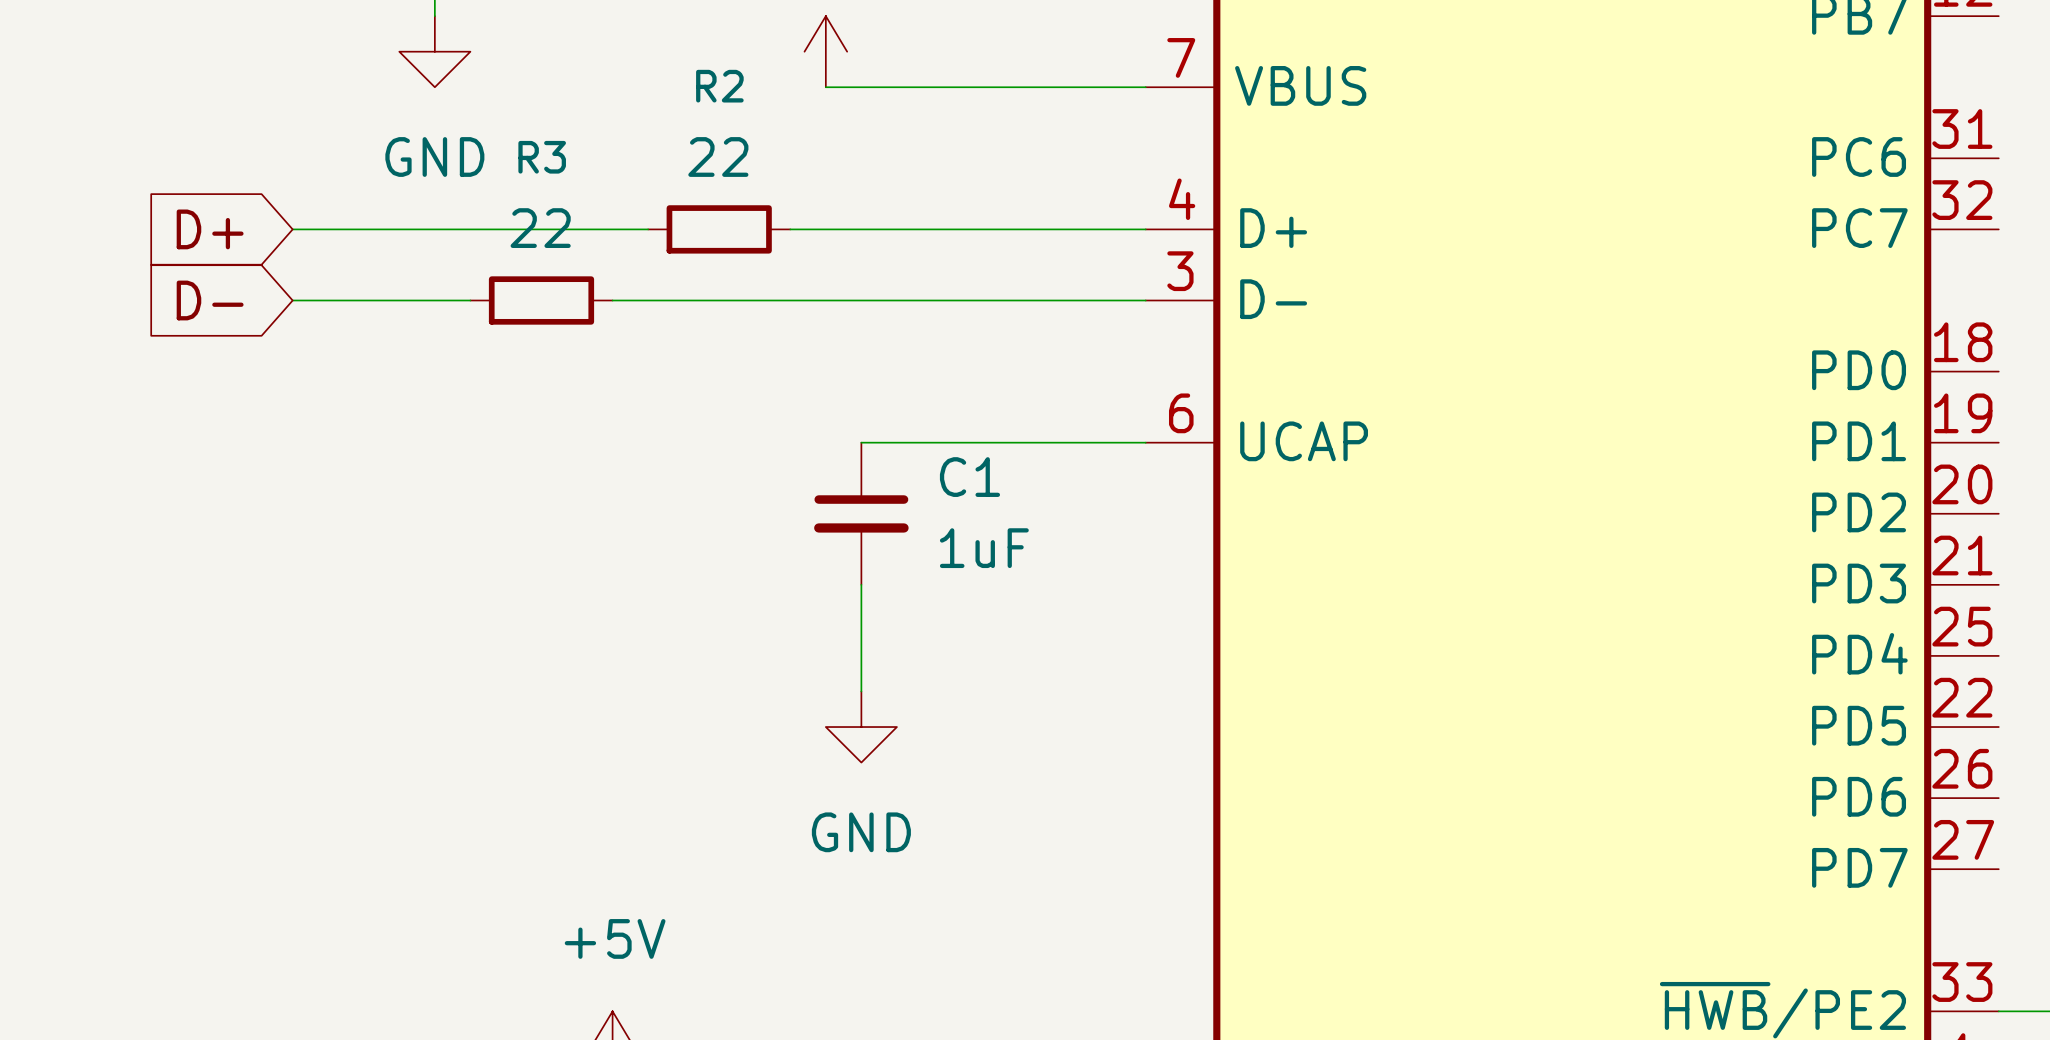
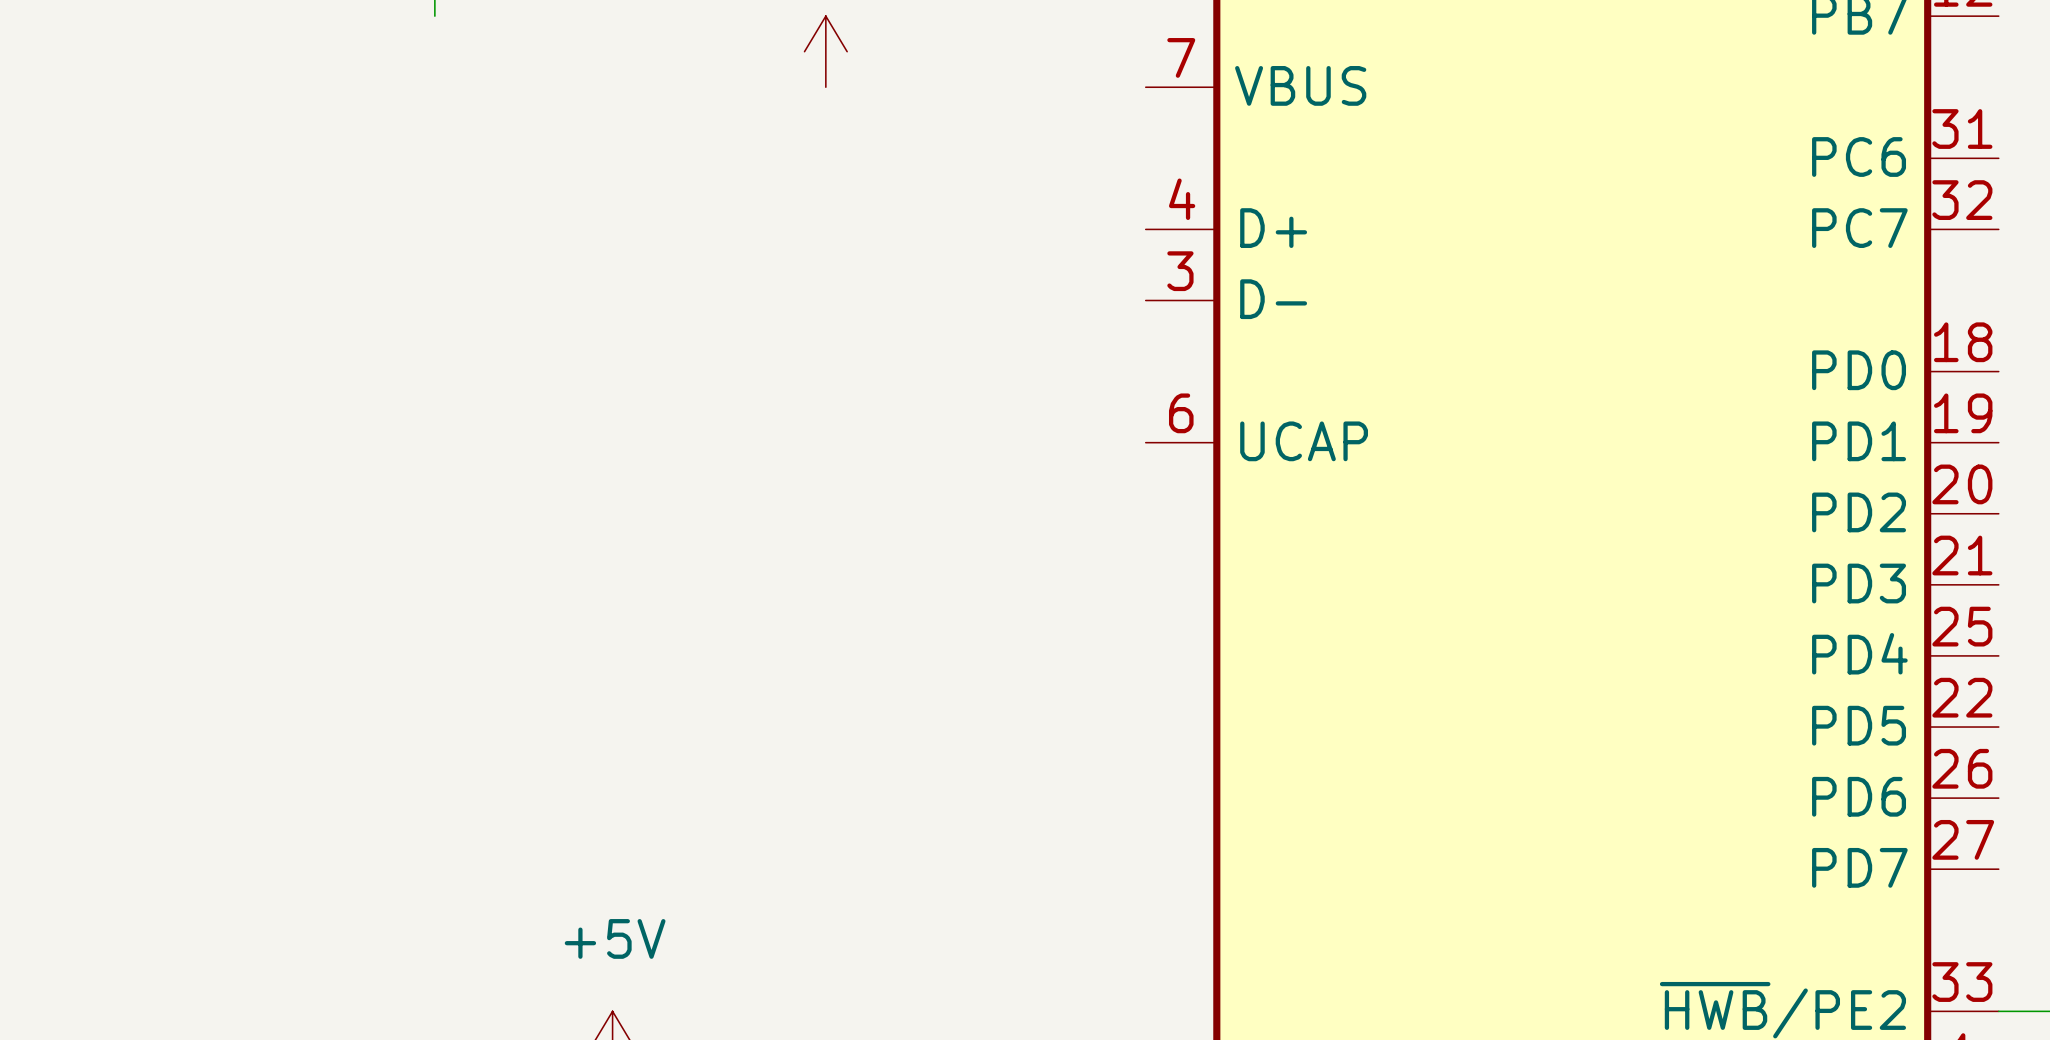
power symbol: GND (434, 51) -> none
wire: (825, 87) (1145, 87) -> none
global label: D+ (210, 229) -> none
wire: (292, 229) (648, 229) -> none
R2: 22 (719, 229) -> none
wire: (790, 229) (1145, 229) -> none
global label: D- (210, 300) -> none
wire: (292, 300) (470, 300) -> none
R3: 22 (541, 300) -> none
wire: (612, 300) (1145, 300) -> none
wire: (861, 442) (1145, 442) -> none
C1: 1uF (861, 513) -> none
wire: (861, 584) (861, 691) -> none
power symbol: GND (861, 727) -> none

